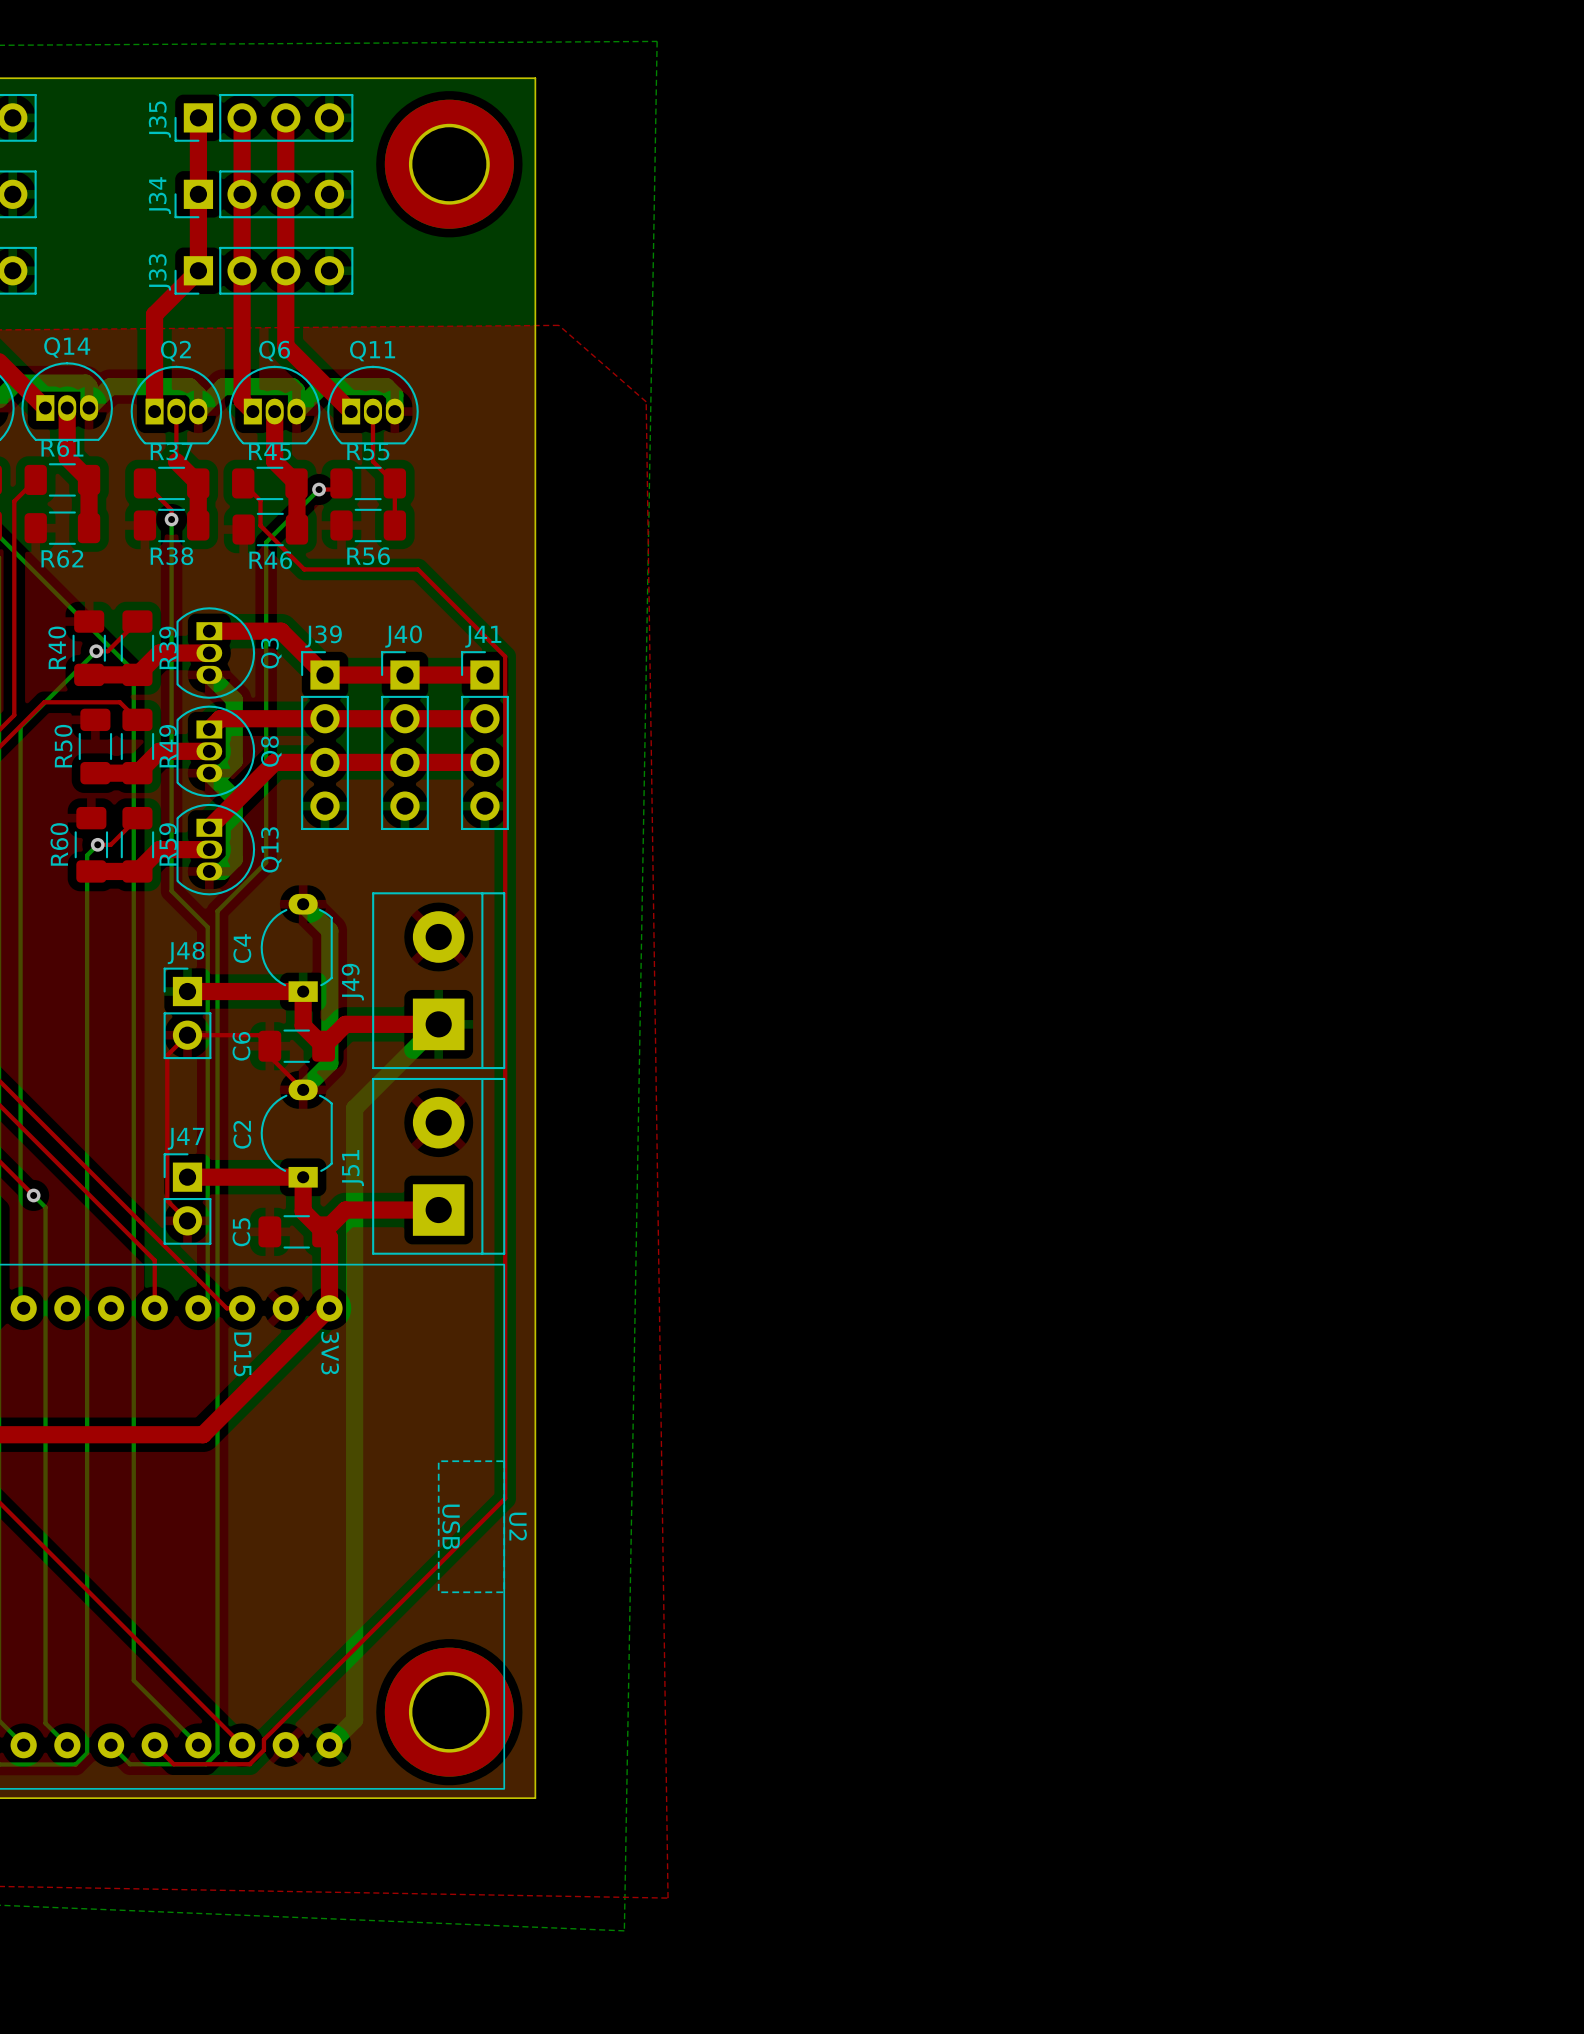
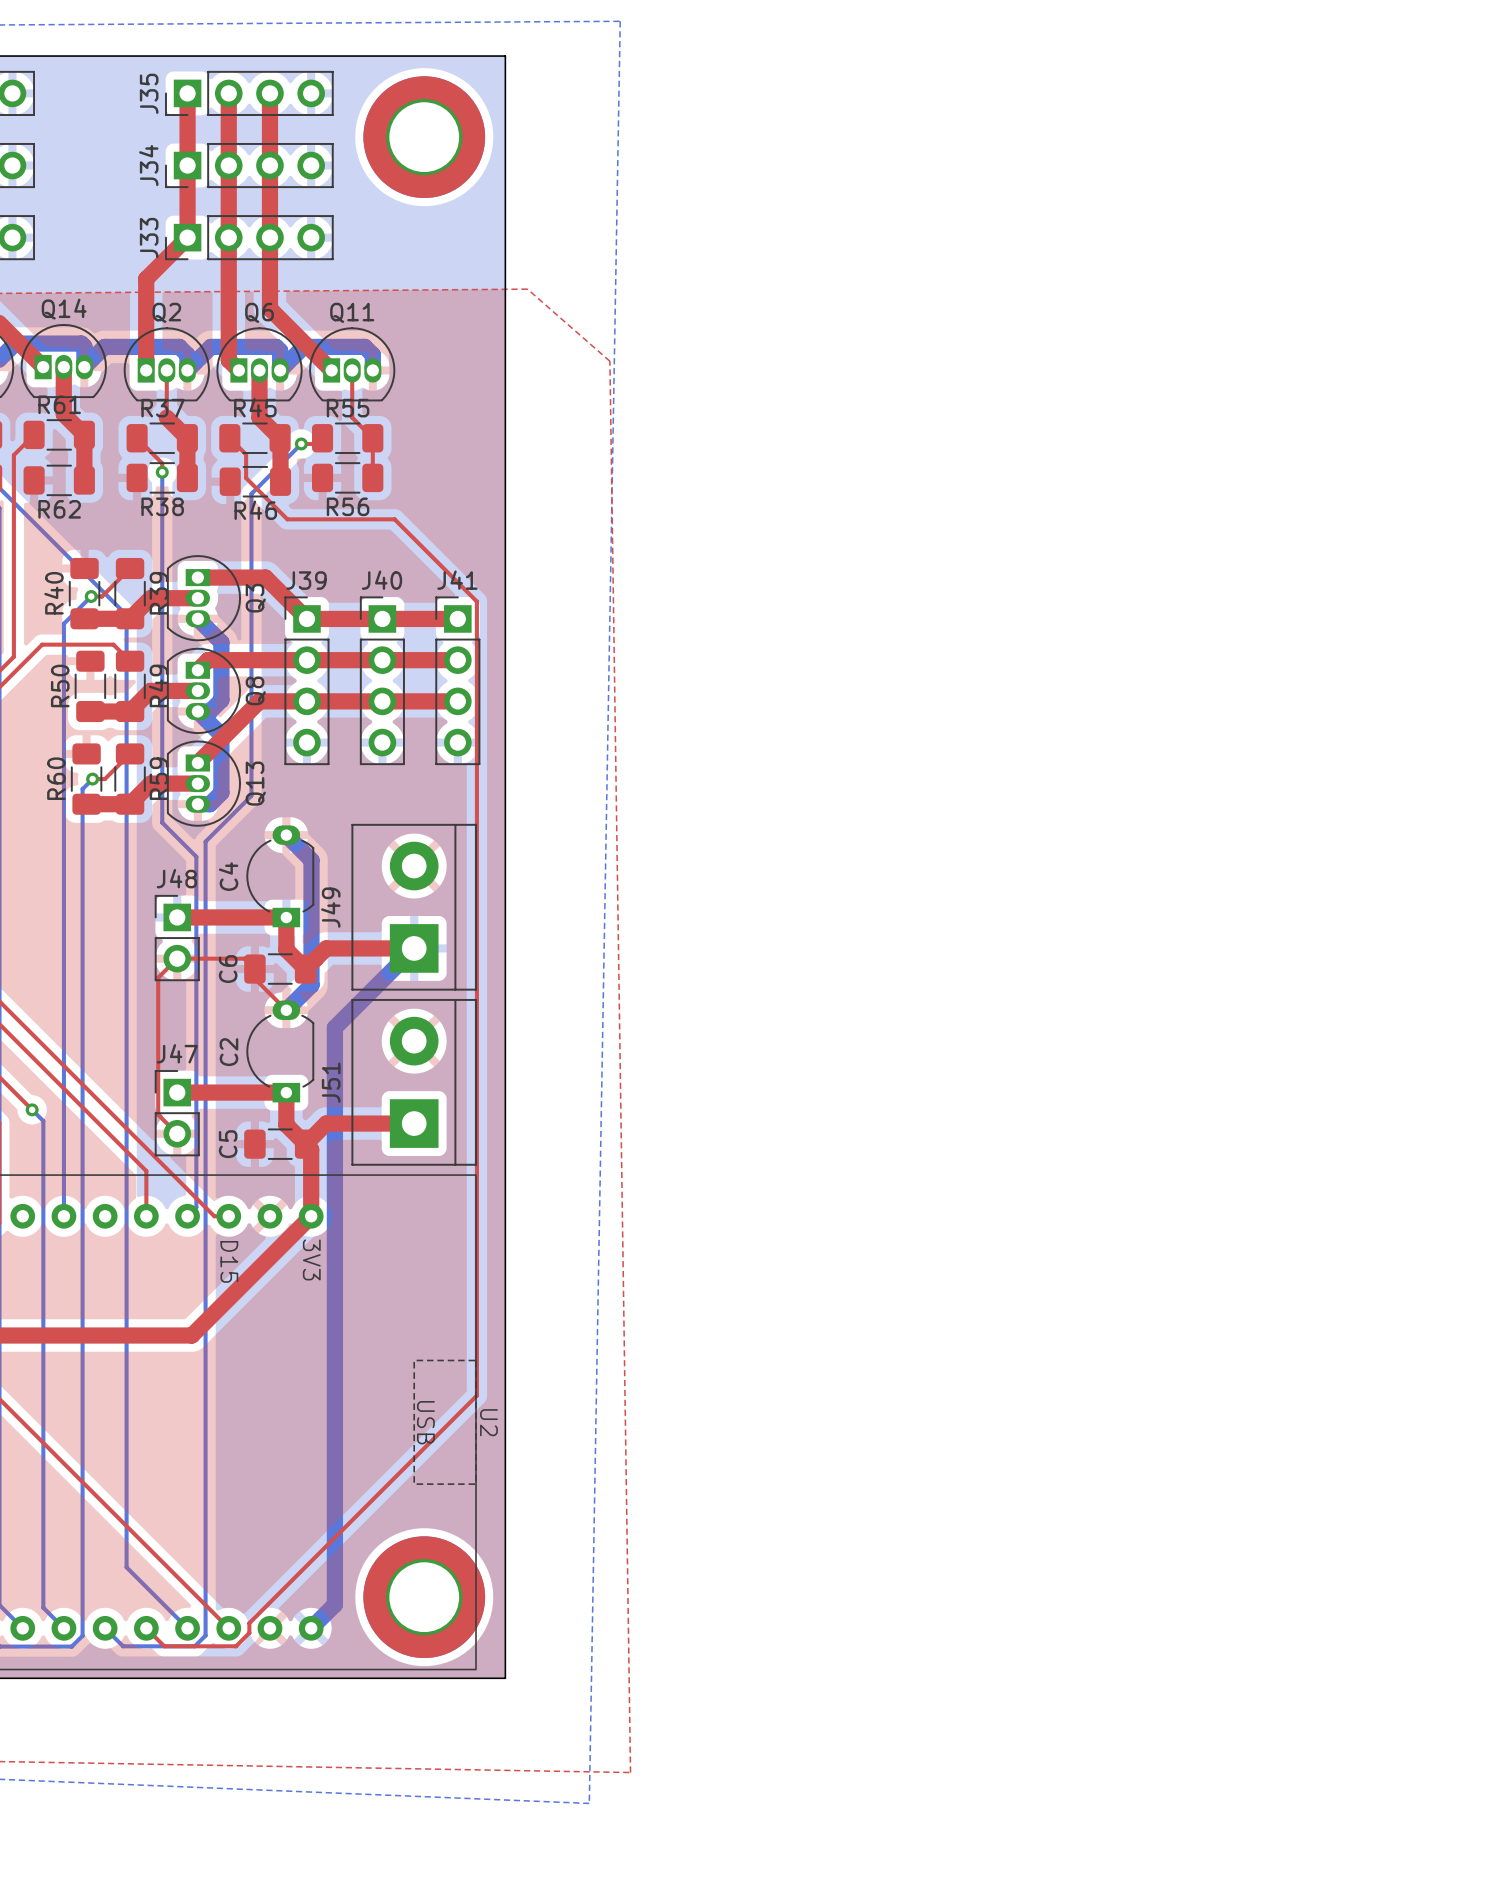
bottom track: (67, 680) (20, 726) (20, 1305) -> (63, 623) (63, 1216)

